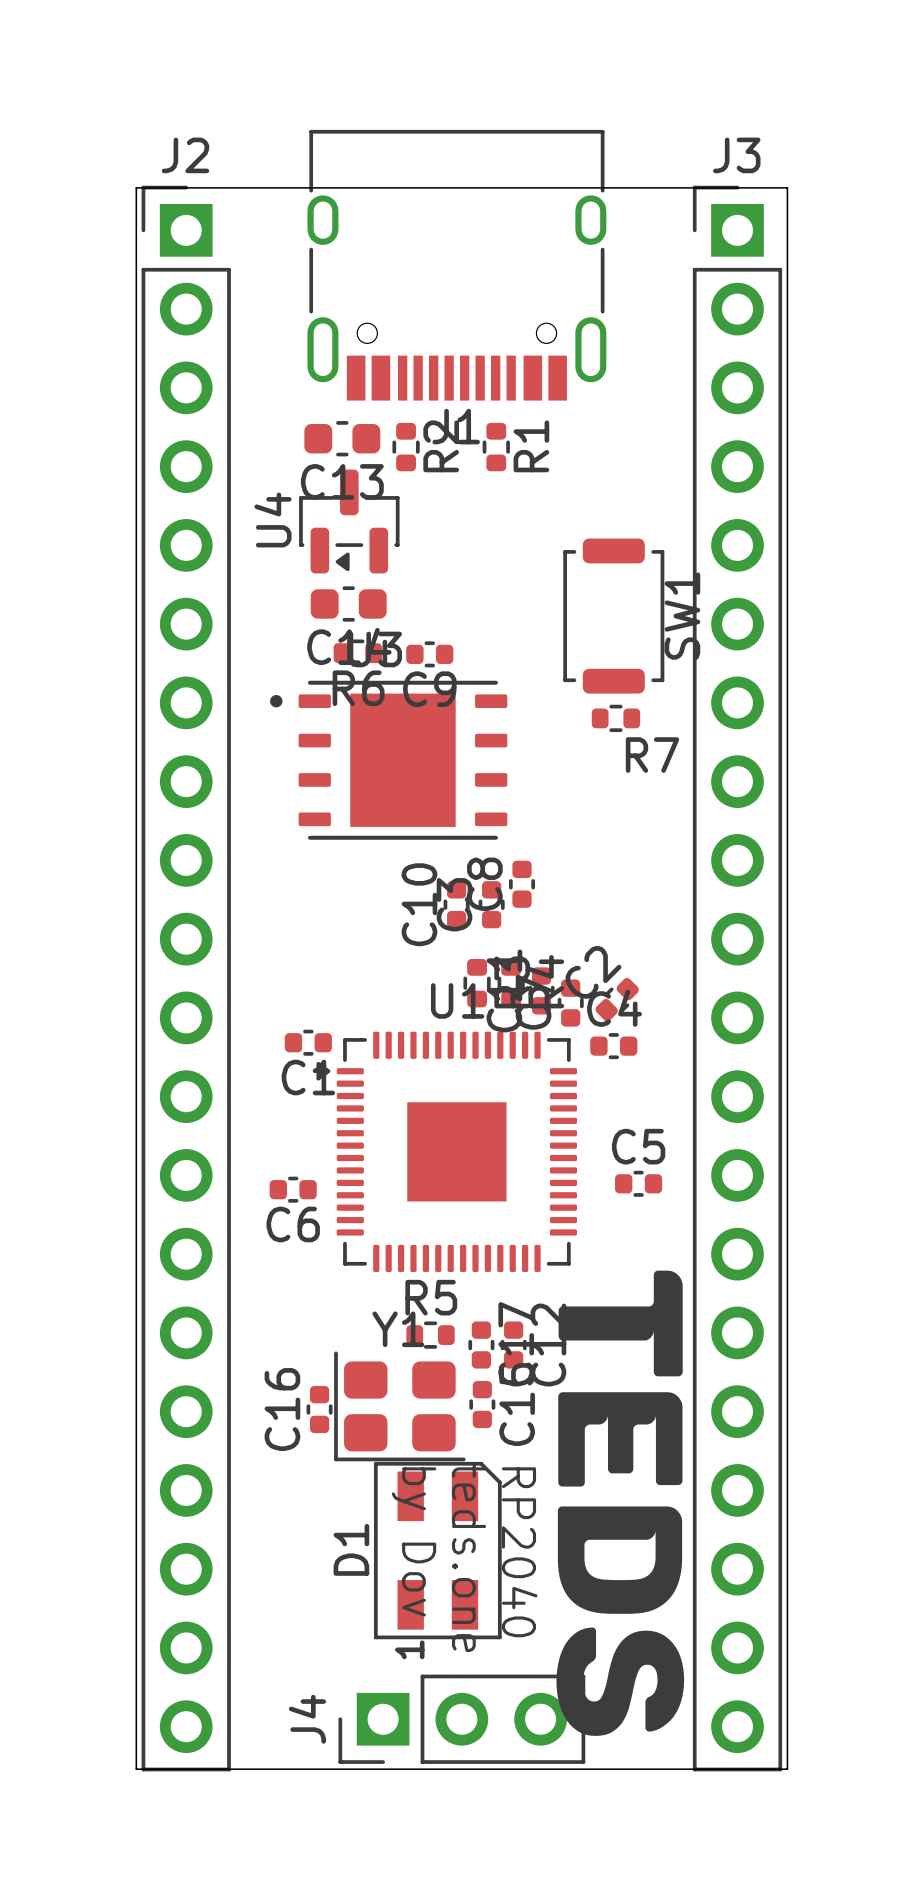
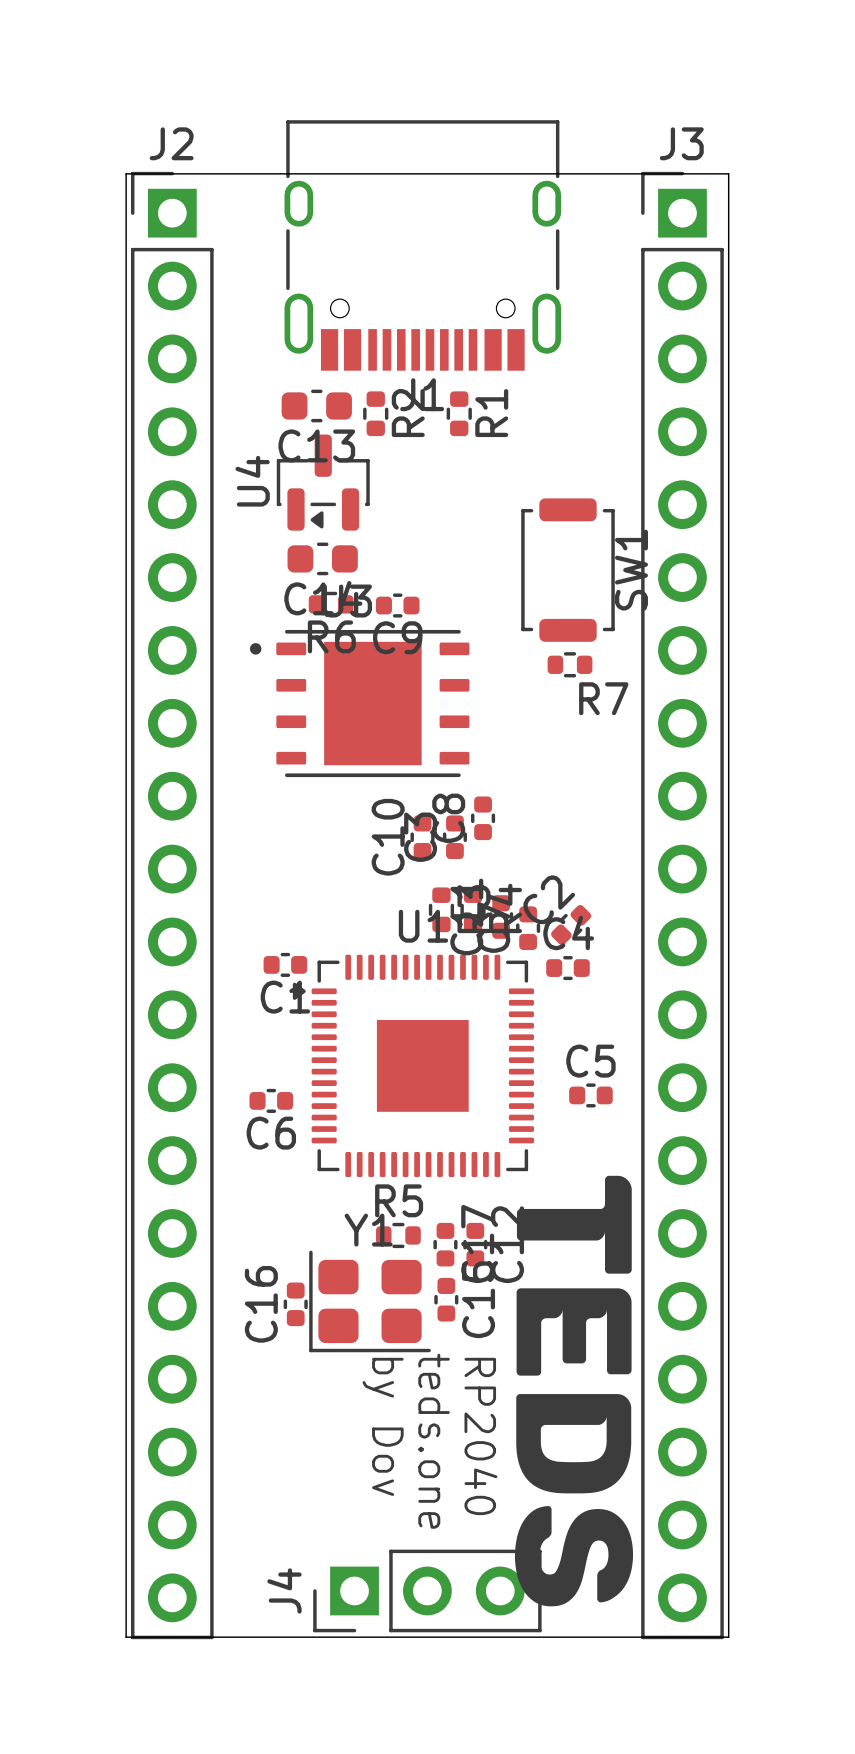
D1: (437, 1550) -> none

